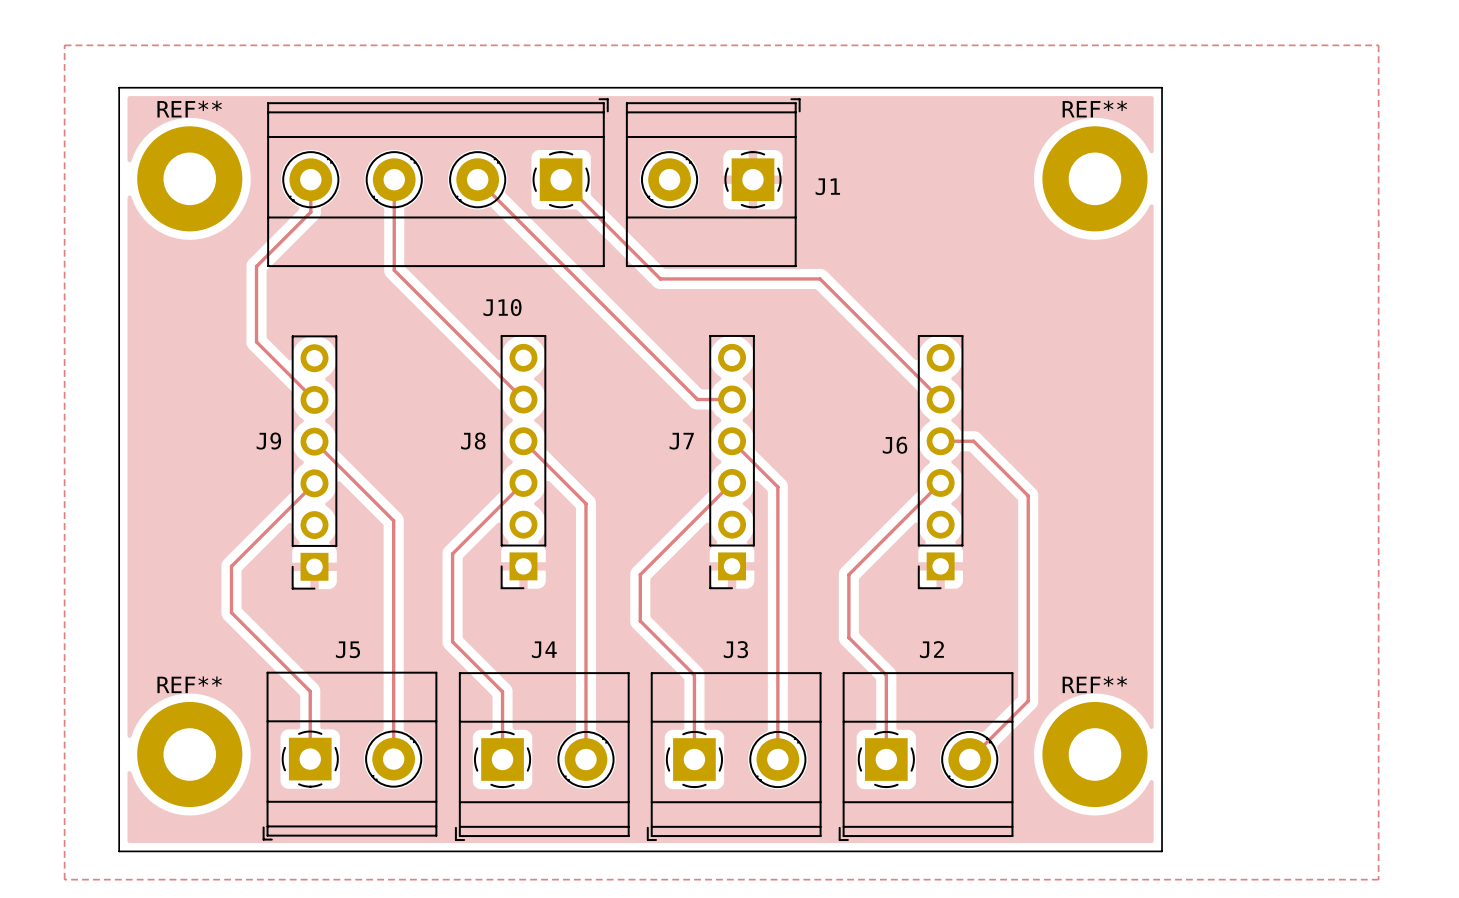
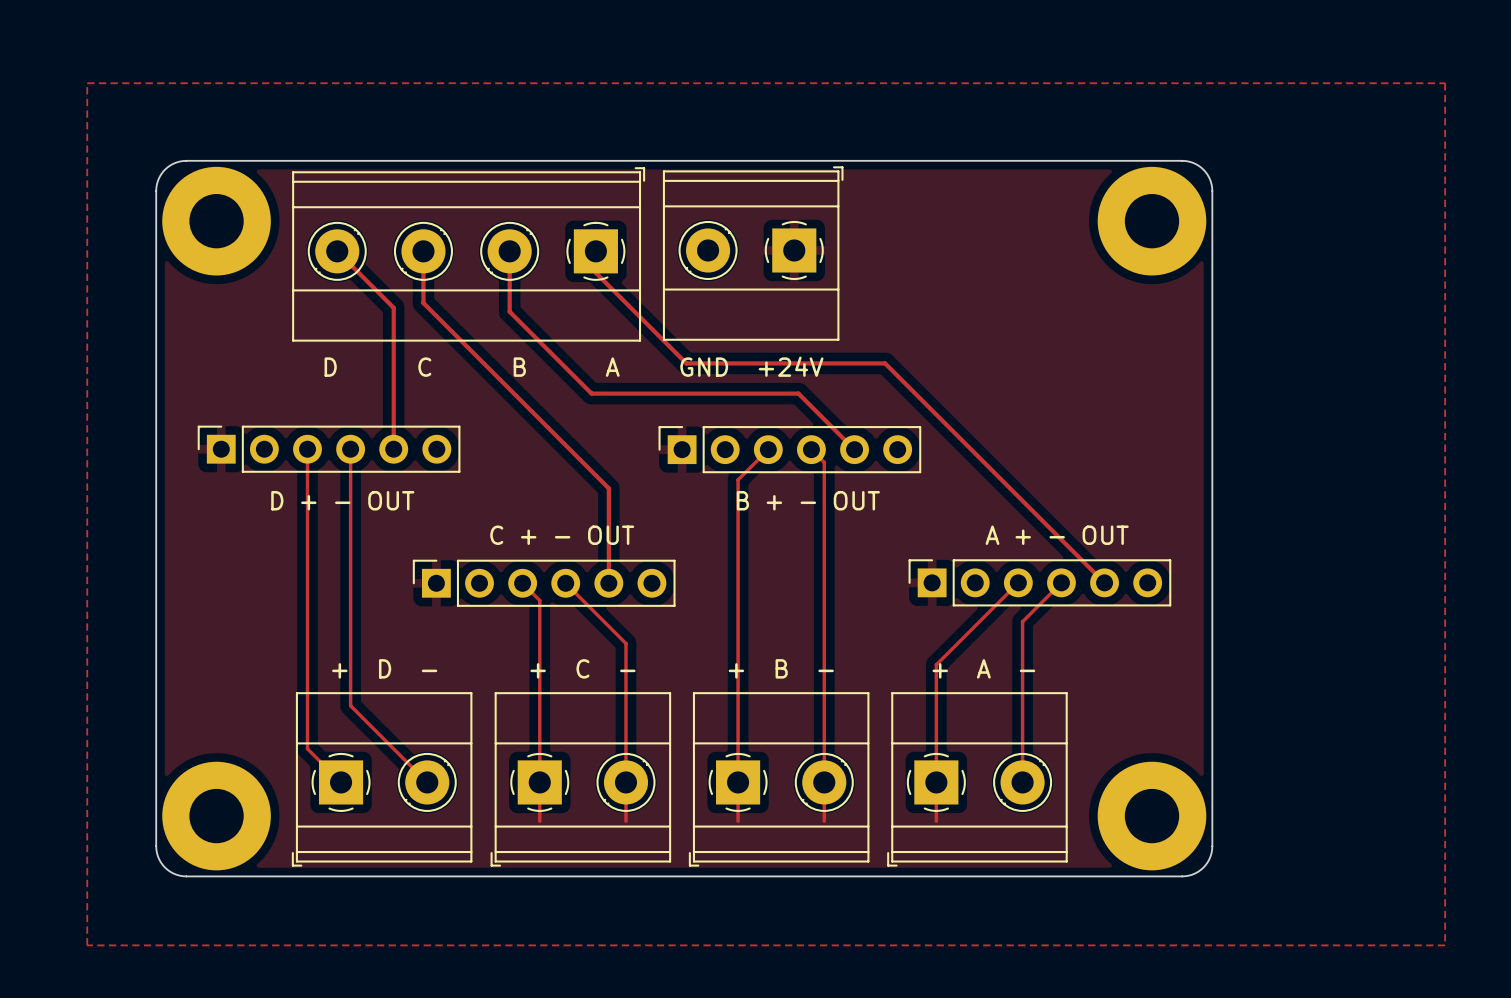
board edge: (119, 87) (1162, 87) (1162, 851) (119, 851) (119, 87) -> (186, 160) (173, 163) (165, 169) (157, 181) (156, 191) (156, 846) (160, 862) (170, 871) (186, 876) (1182, 876) (1195, 873) (1207, 862) (1212, 846) (1212, 191) (1209, 177) (1198, 165) (1182, 160) (186, 160)
REF** name: REF** (189, 109) -> none
REF** name: REF** (1094, 109) -> none
track: (310, 179) (310, 212) (256, 266) (256, 341) (314, 399) -> none
track: (394, 179) (394, 270) (523, 399) -> none
track: (477, 179) (697, 399) (732, 399) -> none
track: (561, 179) (660, 278) (820, 278) (940, 399) -> none
J10: (437, 182) -> none
J1: (713, 182) -> none
track: none -> (337, 251) (393, 307) (393, 449)
track: none -> (423, 251) (423, 303) (608, 488) (608, 583)
track: none -> (509, 251) (509, 311) (591, 393) (798, 393) (854, 449)
track: none -> (595, 251) (595, 272) (686, 363) (885, 363) (1104, 582)
part: none -> (753, 253)
part: none -> (468, 254)
text: none -> D C B A (472, 367)
text: none -> GND +24V (751, 366)
track: none -> (307, 449) (307, 748) (341, 782)
part: none -> (329, 449)
track: none -> (350, 449) (350, 705) (427, 782)
part: none -> (789, 449)
track: (314, 441) (393, 520) (393, 759) -> none
track: (523, 441) (585, 503) (585, 587) -> (565, 583) (625, 643)
track: (732, 441) (777, 487) -> (811, 449) (824, 462) (824, 539)
track: (940, 441) (973, 441) (1028, 495) (1028, 701) (969, 759) -> none
text: none -> D + - OUT (342, 500)
text: none -> B + - OUT (808, 500)
J9: (314, 462) -> none
J8: (523, 462) -> none
J7: (732, 462) -> none
J6: (940, 462) -> none
track: (523, 482) (452, 553) (452, 641) (502, 691) -> (522, 583) (539, 600) (539, 751)
text: none -> C + - OUT (562, 535)
track: (732, 482) (640, 574) (640, 621) (694, 675) -> (768, 449) (738, 479) (738, 734)
track: (940, 482) (848, 574) (848, 637) (886, 675) -> (1018, 582) (936, 664) (936, 734)
text: none -> A + - OUT (1057, 535)
track: (314, 483) (231, 566) (231, 612) (310, 691) (310, 759) -> none
part: none -> (1039, 582)
track: none -> (1061, 582) (1022, 621) (1022, 782)
part: none -> (544, 583)
text: none -> + D - (384, 668)
text: none -> + C - (582, 668)
text: none -> + B - (781, 668)
text: none -> + A - (983, 668)
REF** name: REF** (189, 684) -> none
REF** name: REF** (1094, 684) -> none
part: none -> (382, 779)
part: none -> (580, 779)
part: none -> (779, 779)
part: none -> (977, 779)
J5: (349, 756) -> none
J4: (542, 756) -> none
J3: (734, 756) -> none
J2: (926, 756) -> none

